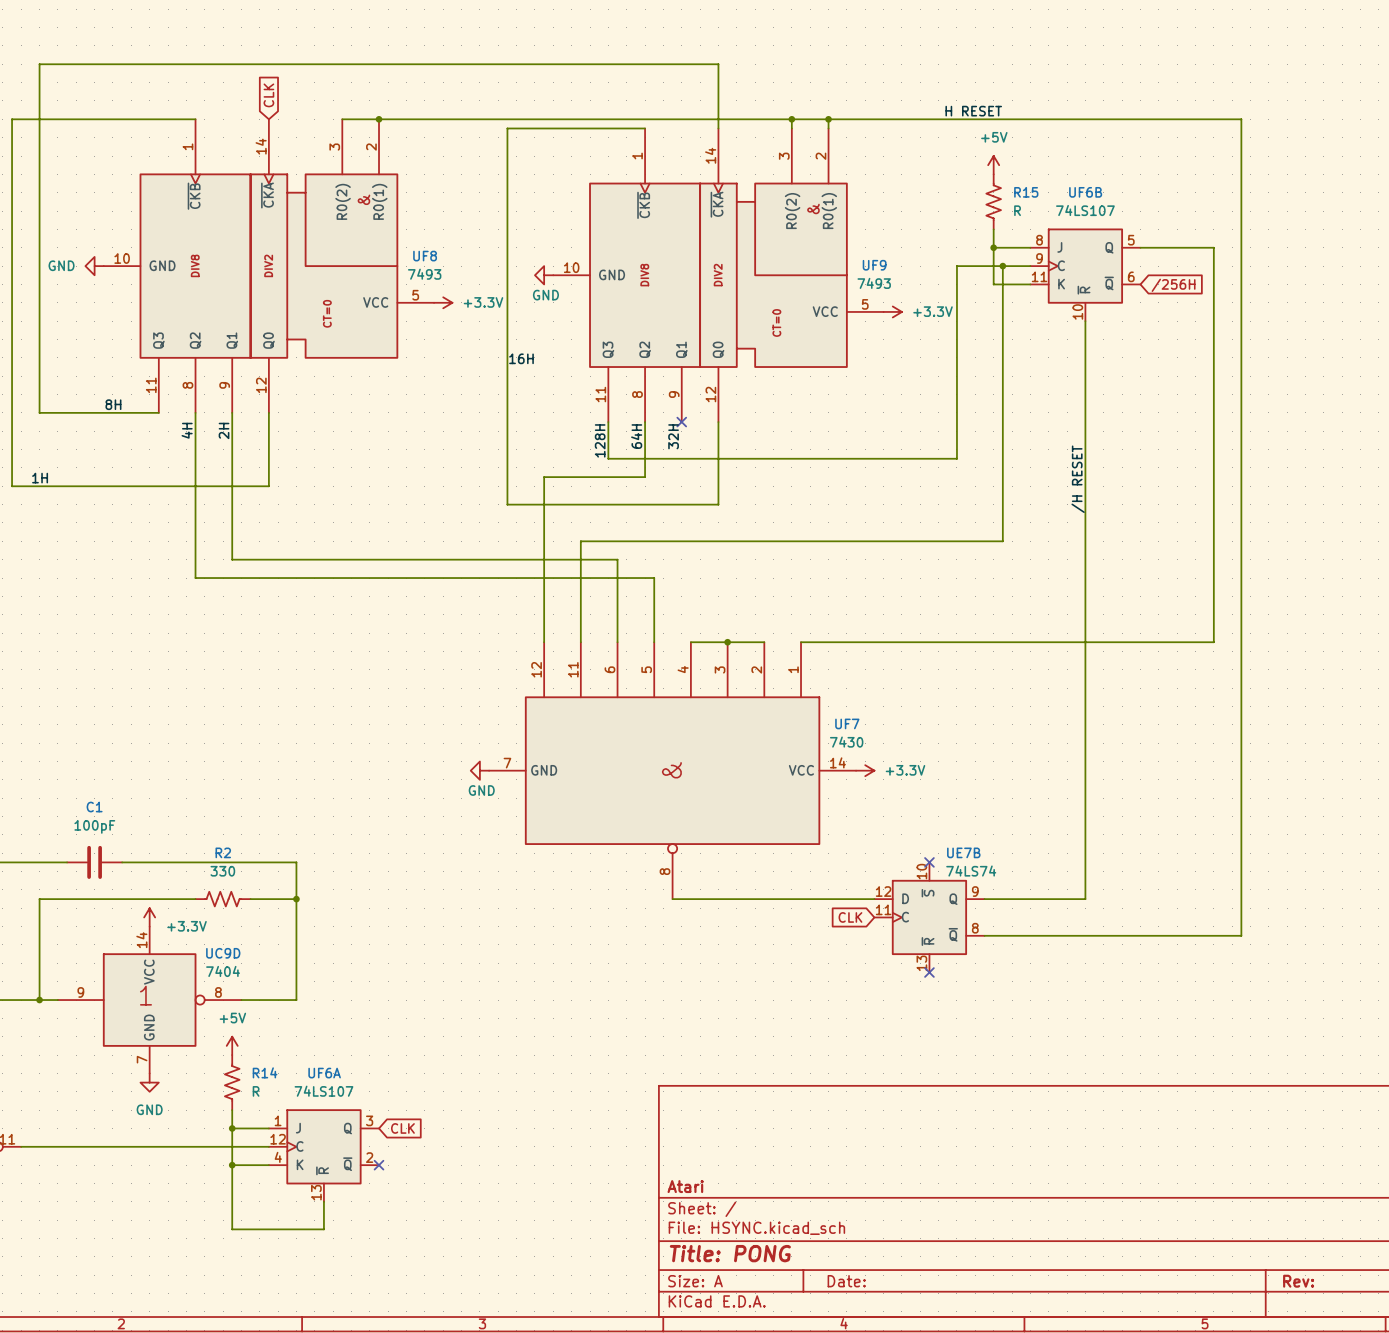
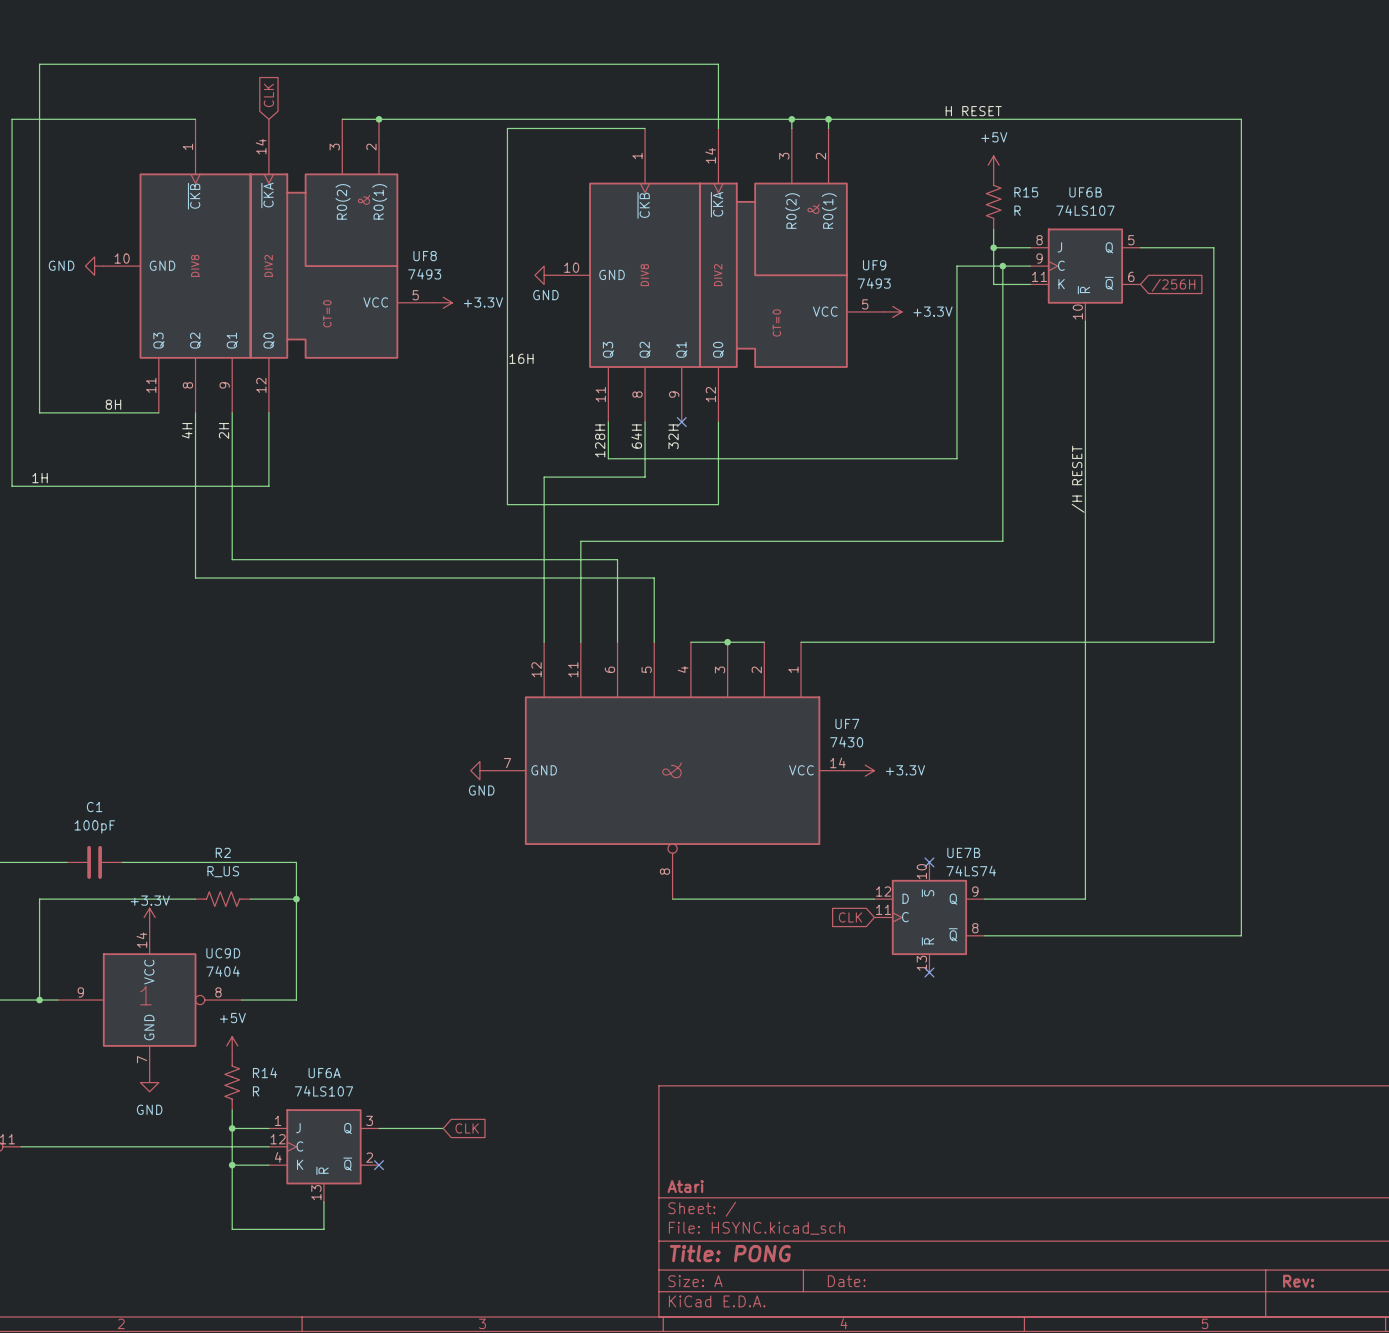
R2 value: 330 (222, 871) -> R_US (223, 871)
power symbol text position: +3.3V (187, 926) -> +3.3V (150, 900)
wire: none -> (379, 1128) (443, 1128)
global label position: CLK (402, 1128) -> CLK (467, 1128)

